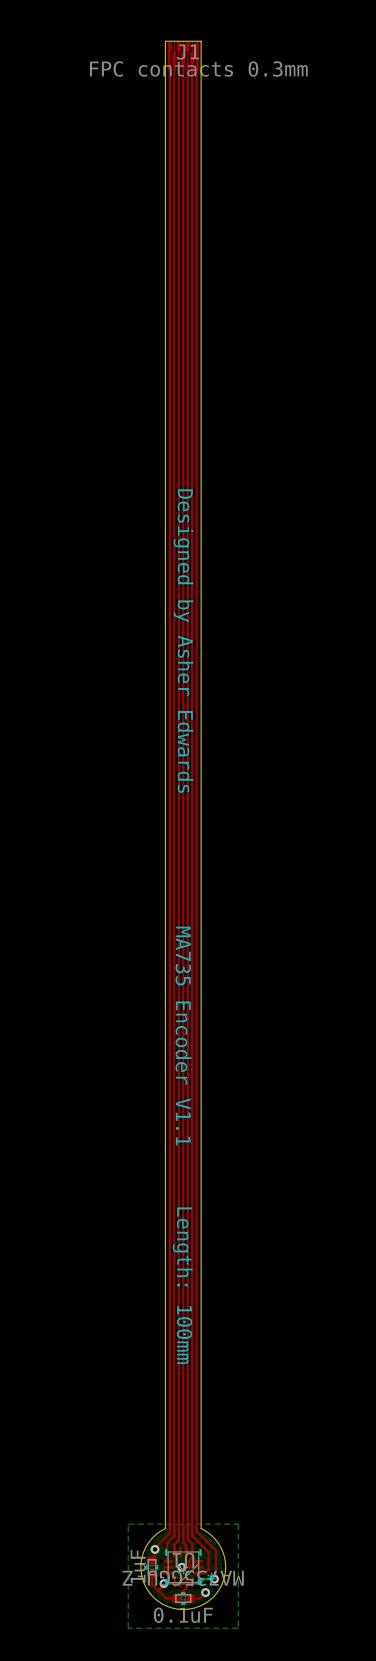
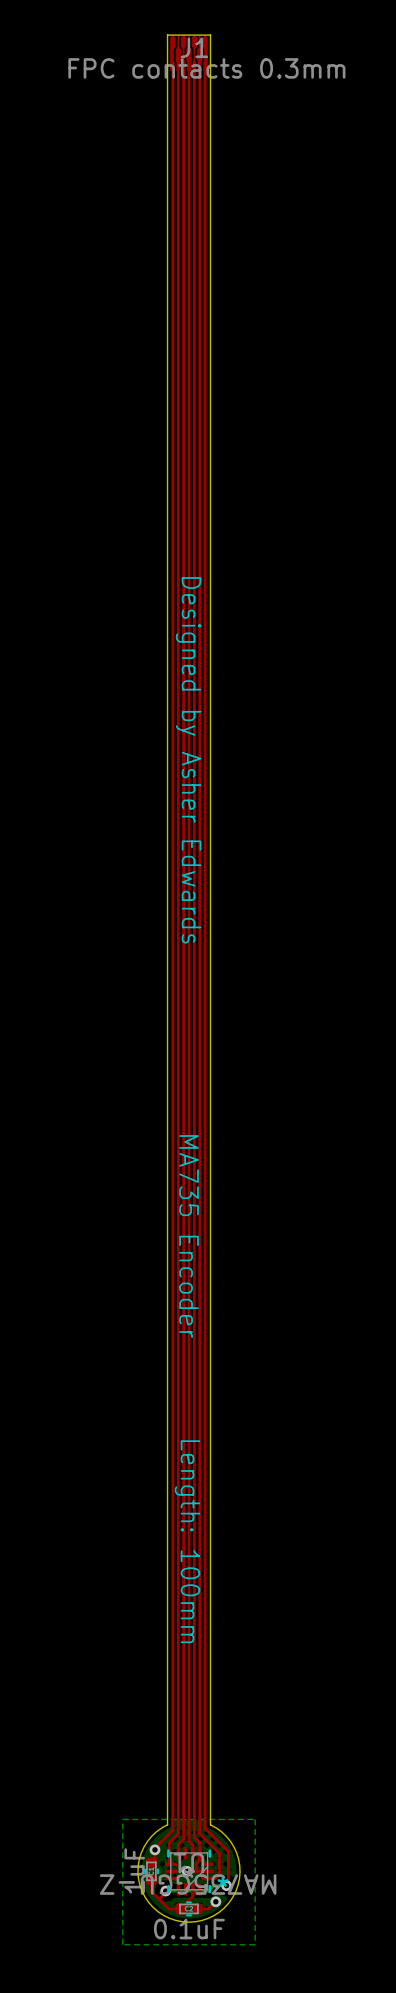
text: MA735 Encoder V1.1 (183, 1036) -> MA735 Encoder (189, 1236)

